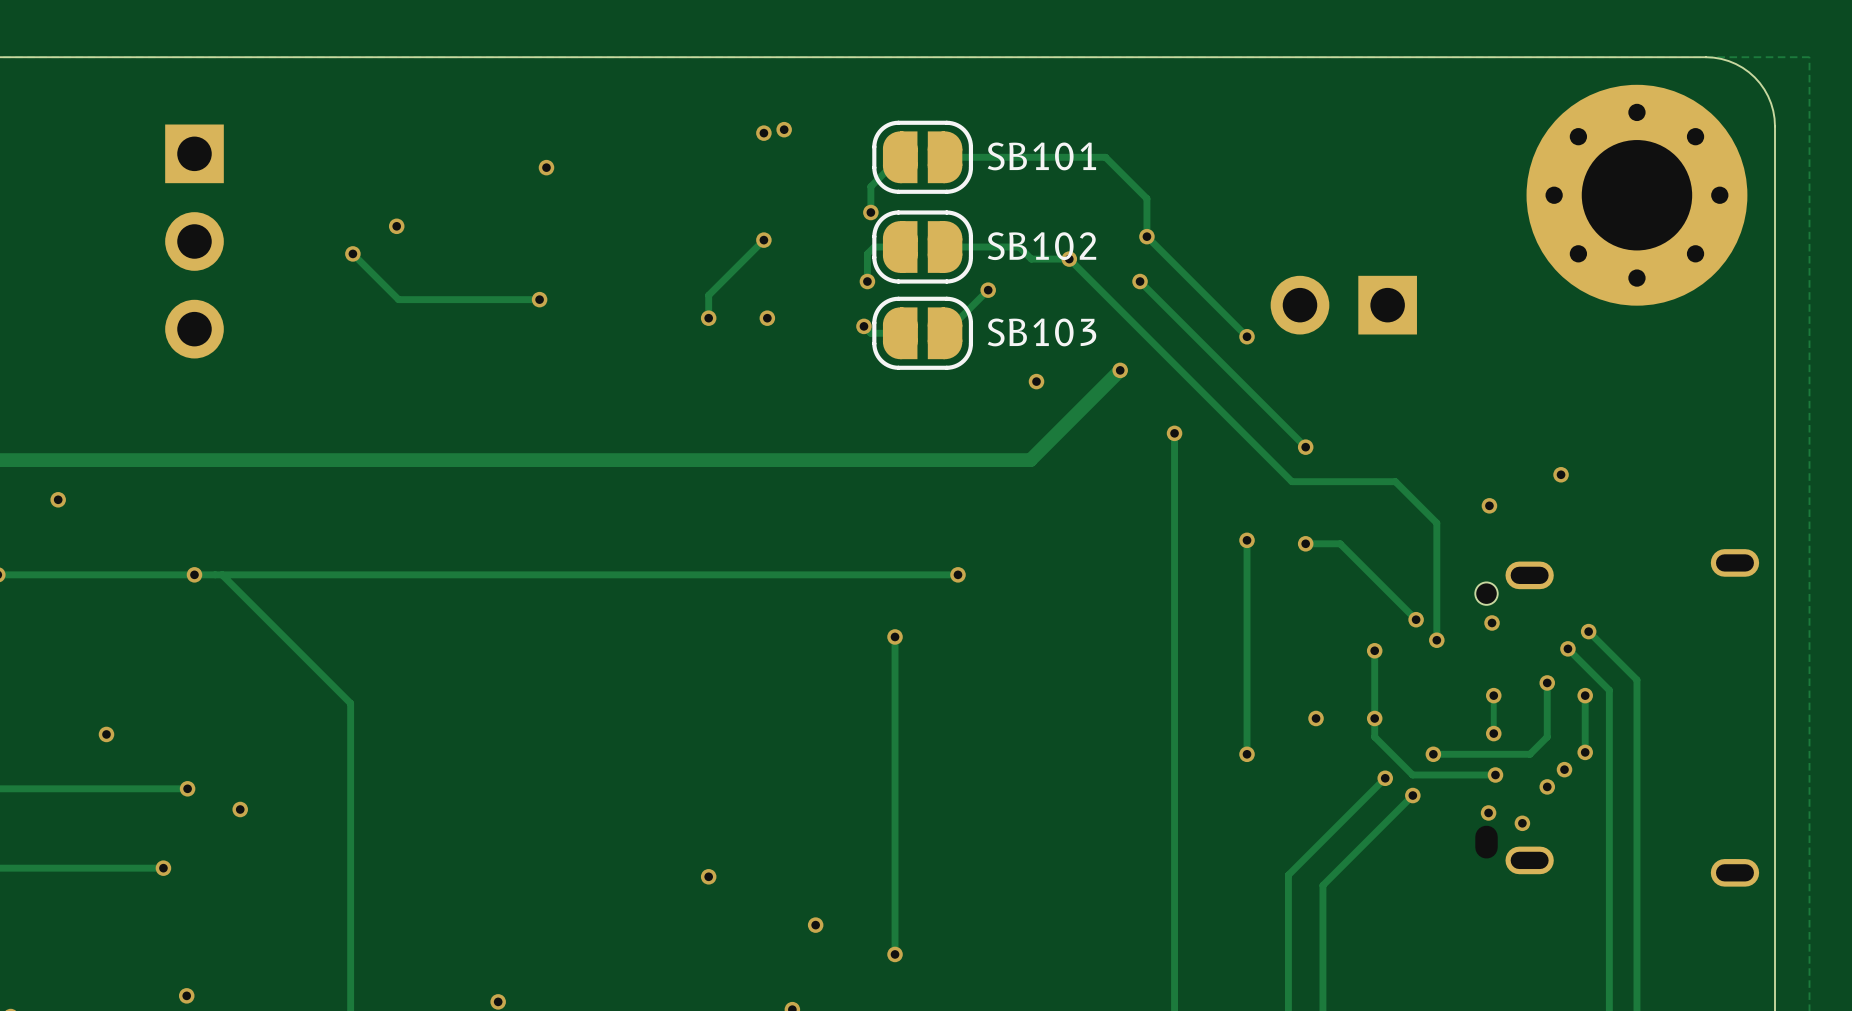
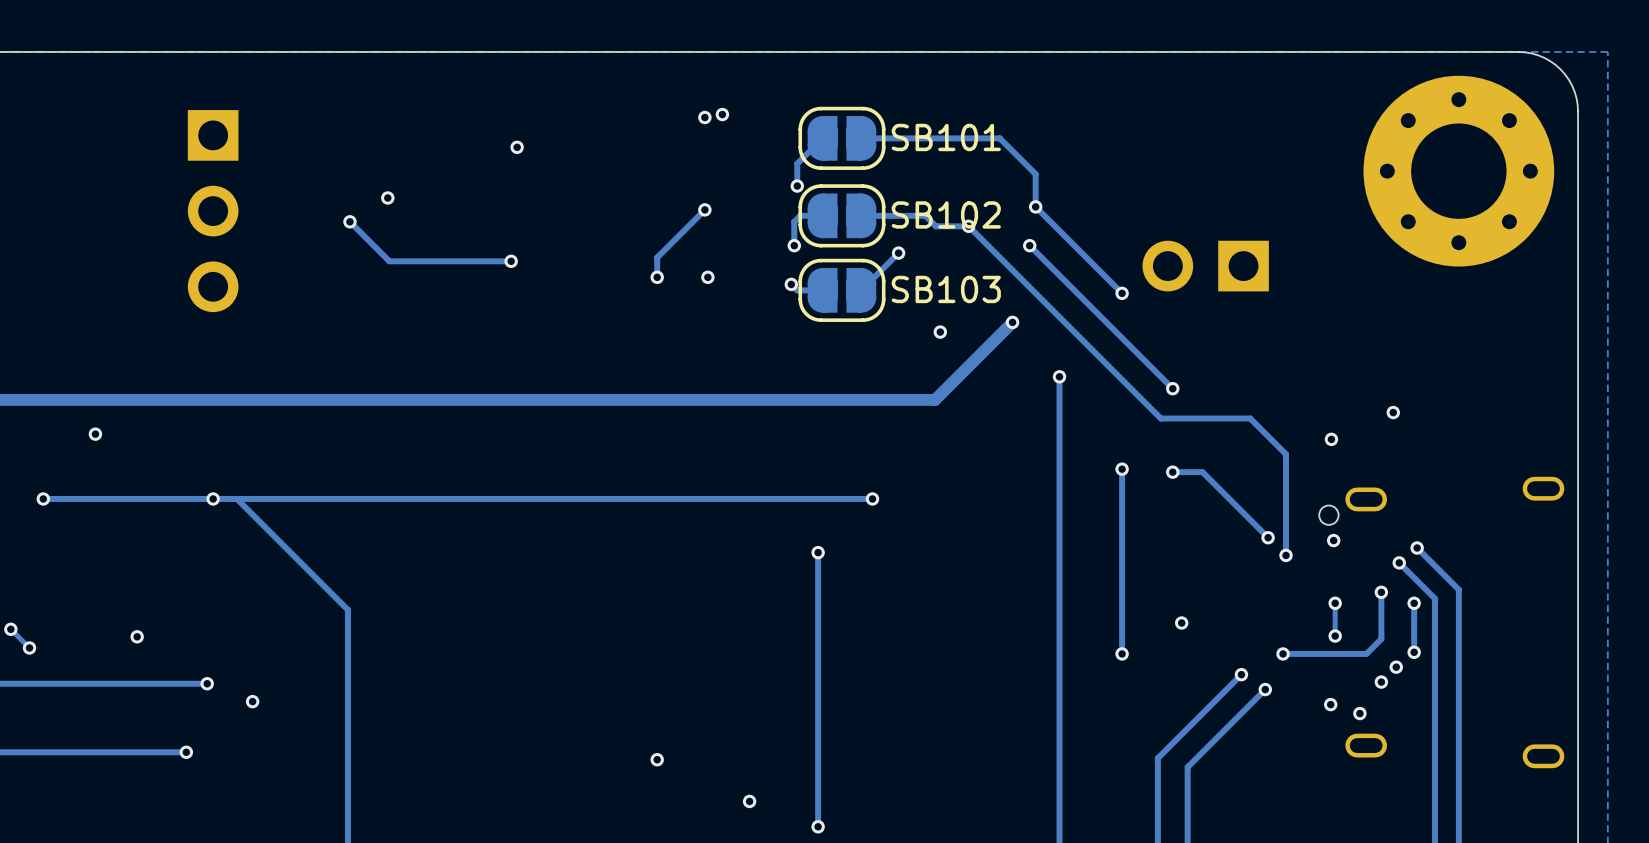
track: (1374, 650) (1374, 737) (1412, 774) (1495, 774) -> none
via: (1374, 650) -> none
via: (1374, 718) -> none
via: (1495, 774) -> none

